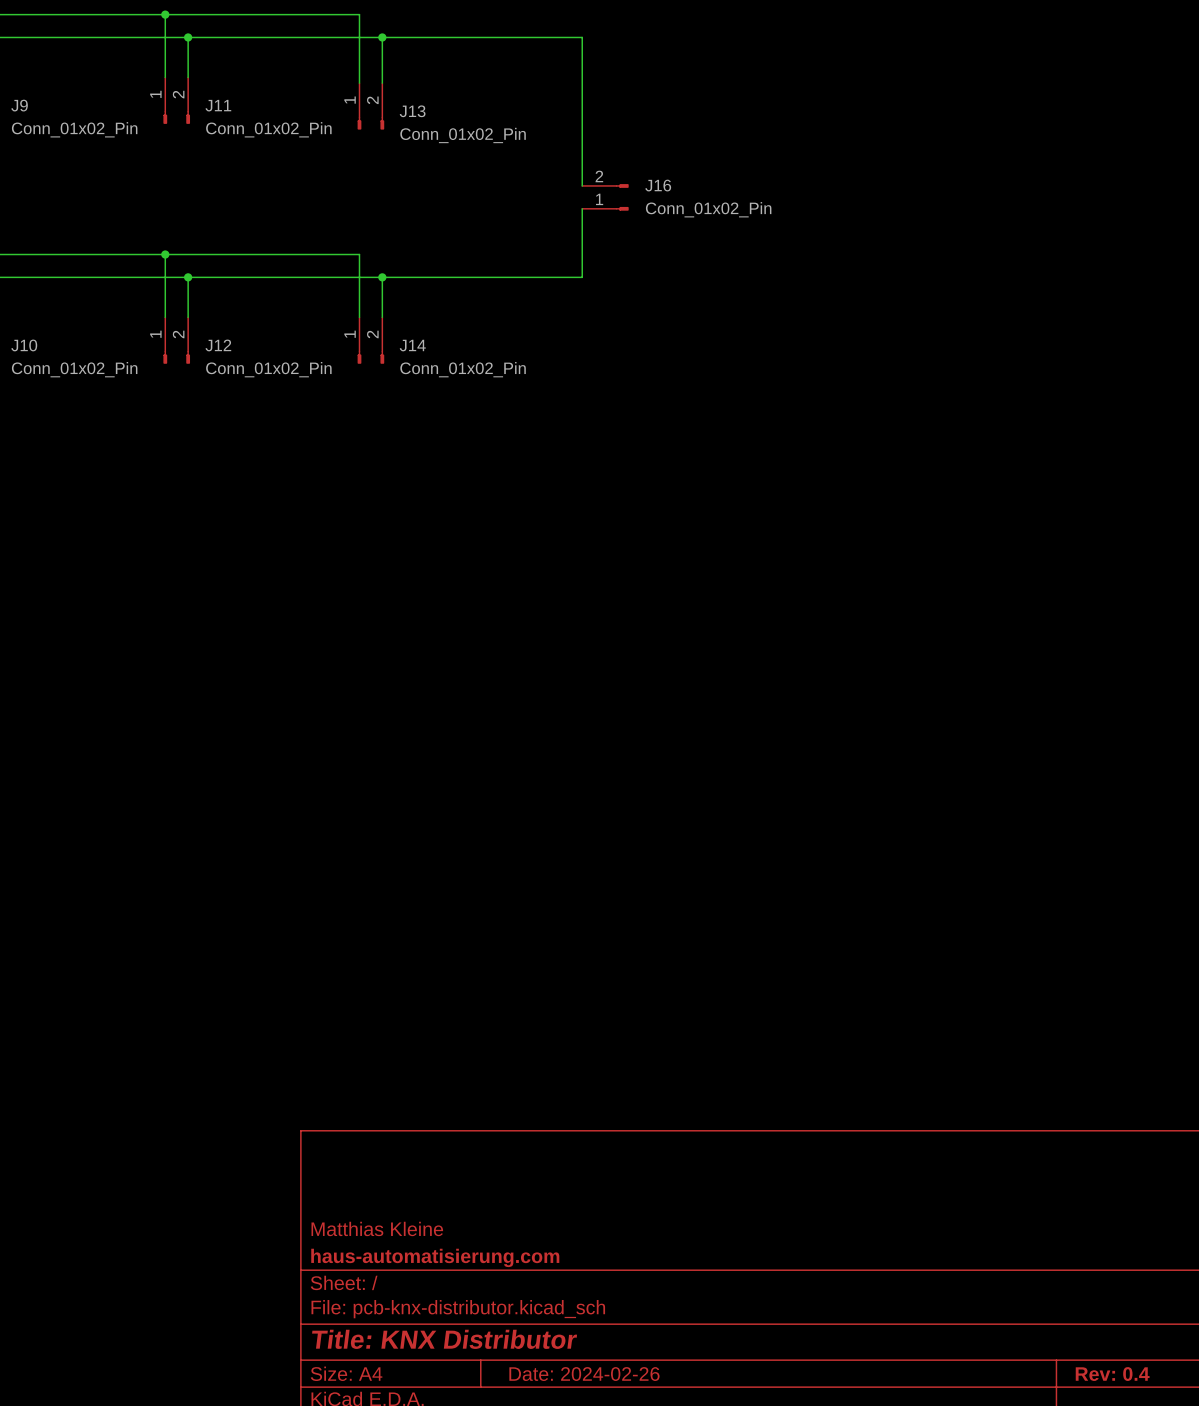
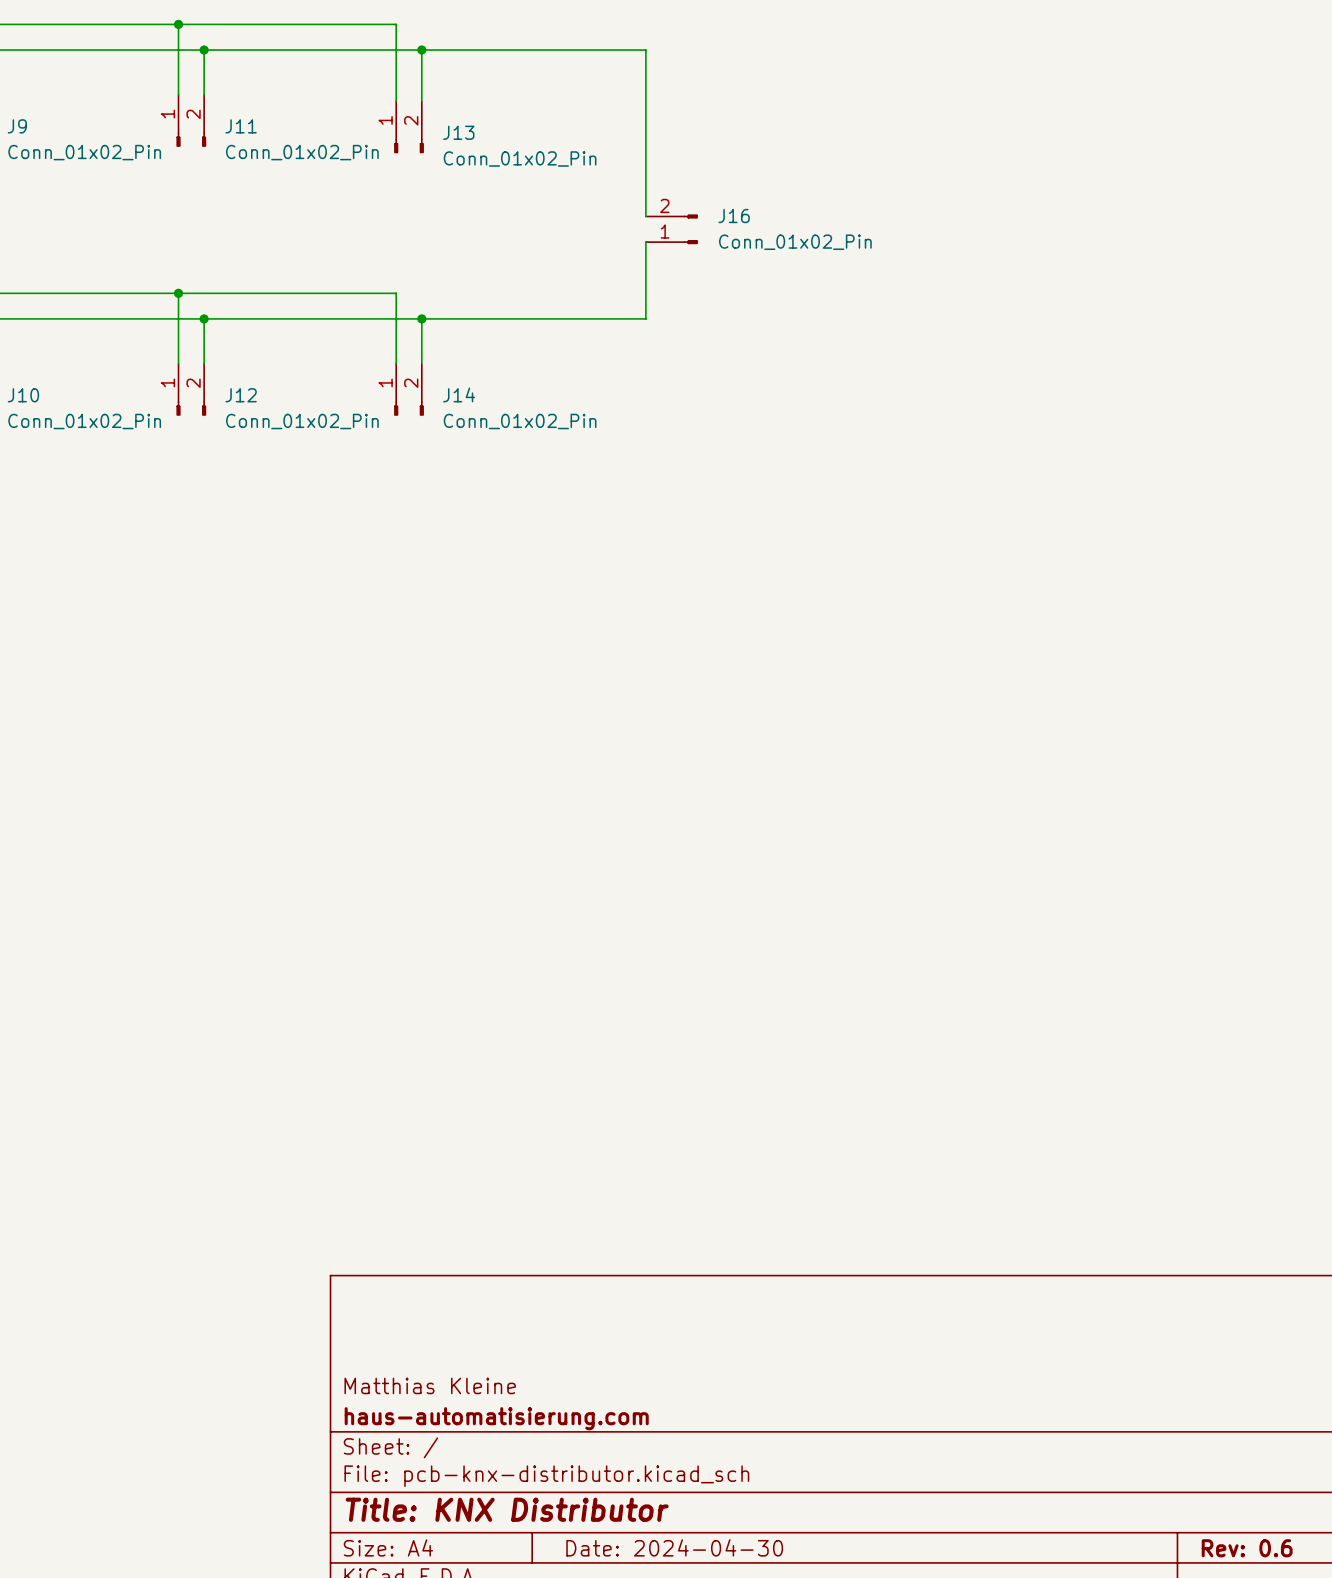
title block: Date: 2024-02-26 (584, 1374) -> Date: 2024-04-30 (674, 1547)
title block: Rev: 0.4 (1112, 1374) -> Rev: 0.6 (1247, 1548)

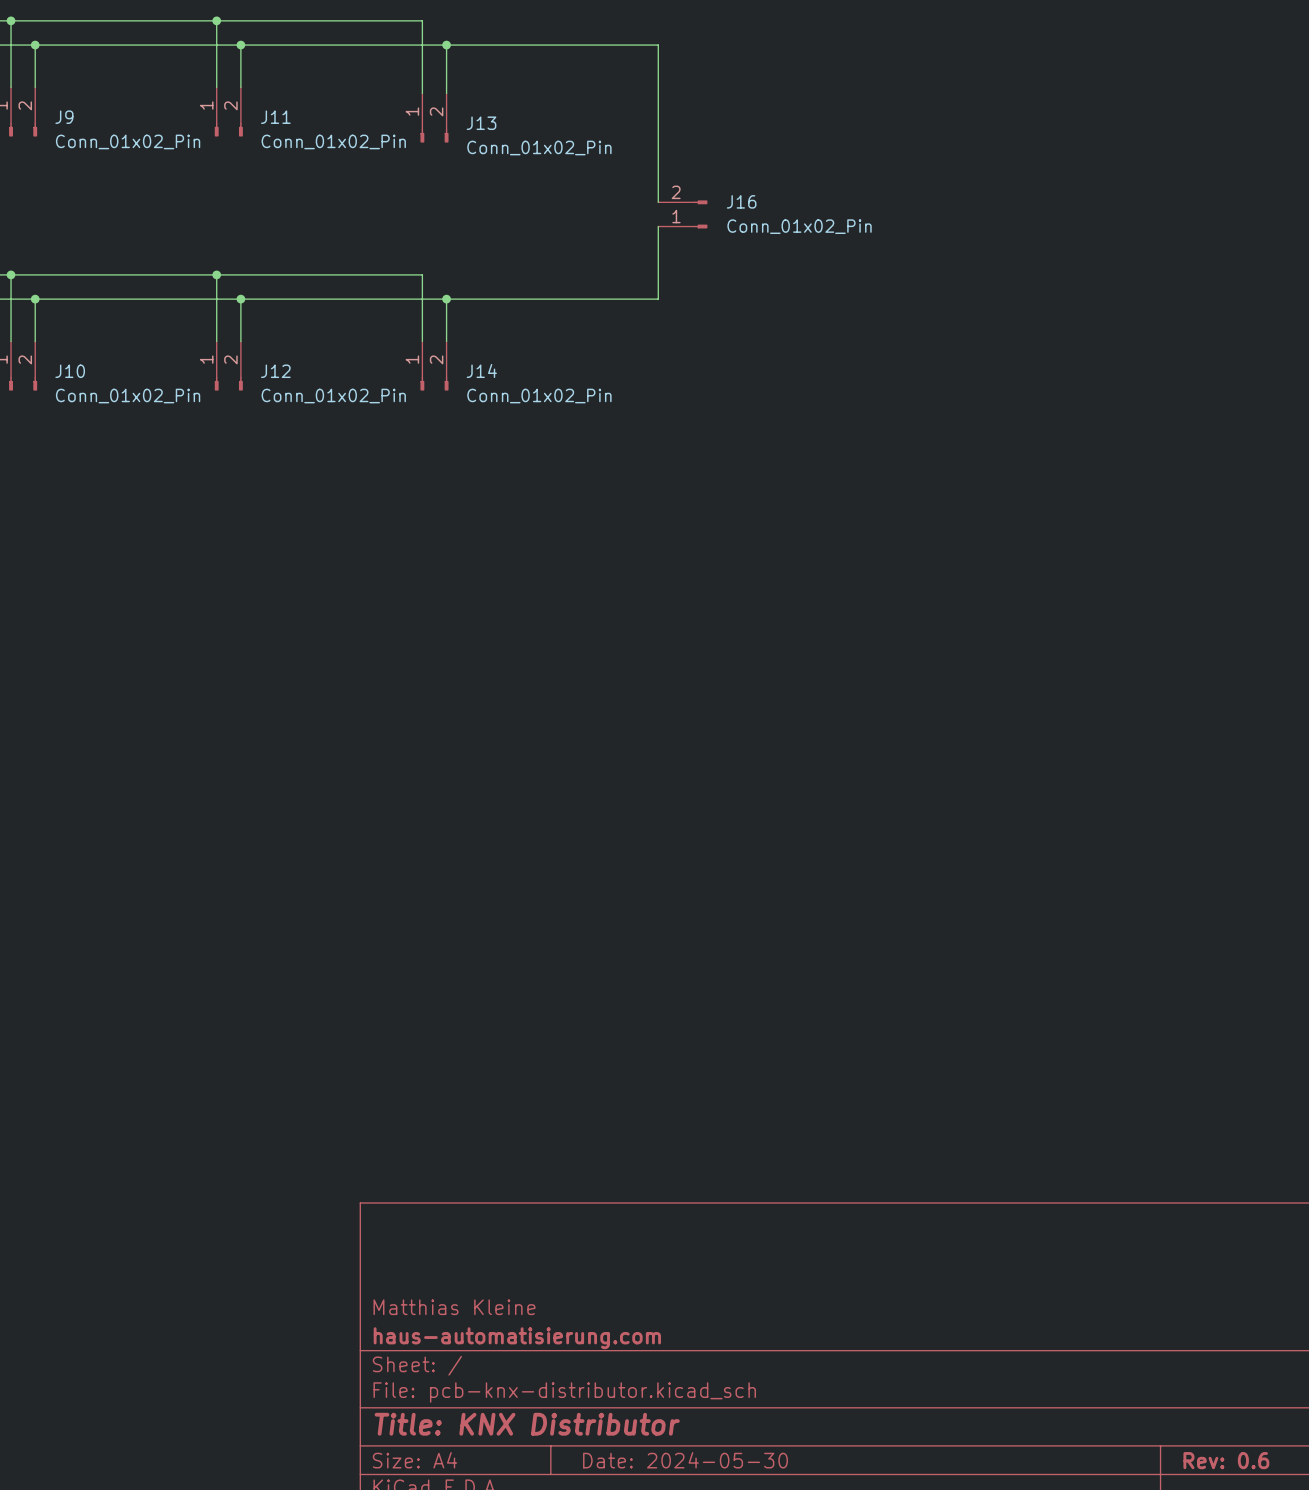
title block: Date: 2024-04-30 (674, 1547) -> Date: 2024-05-30 (685, 1460)

